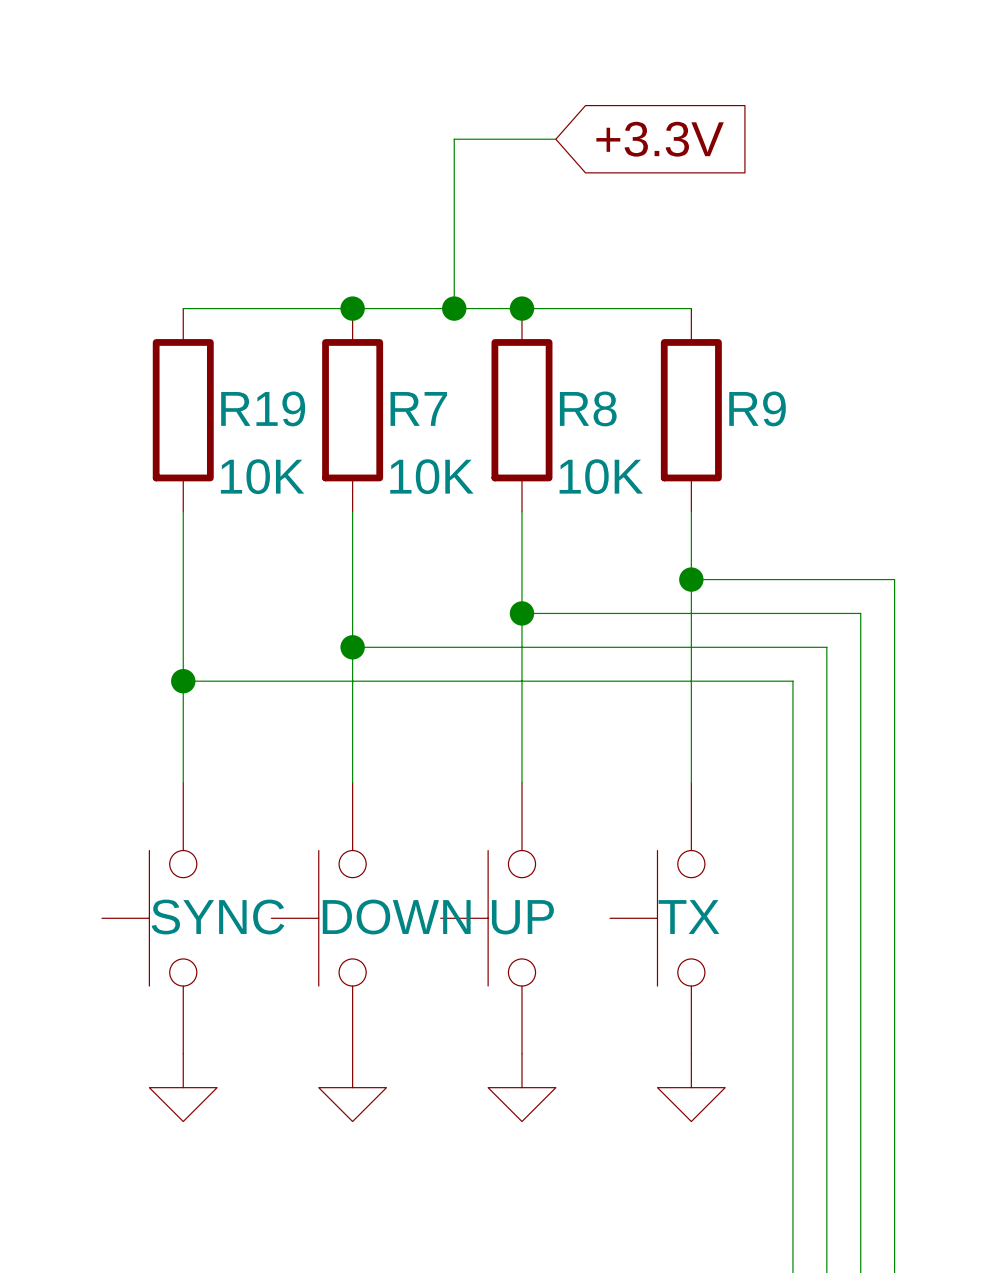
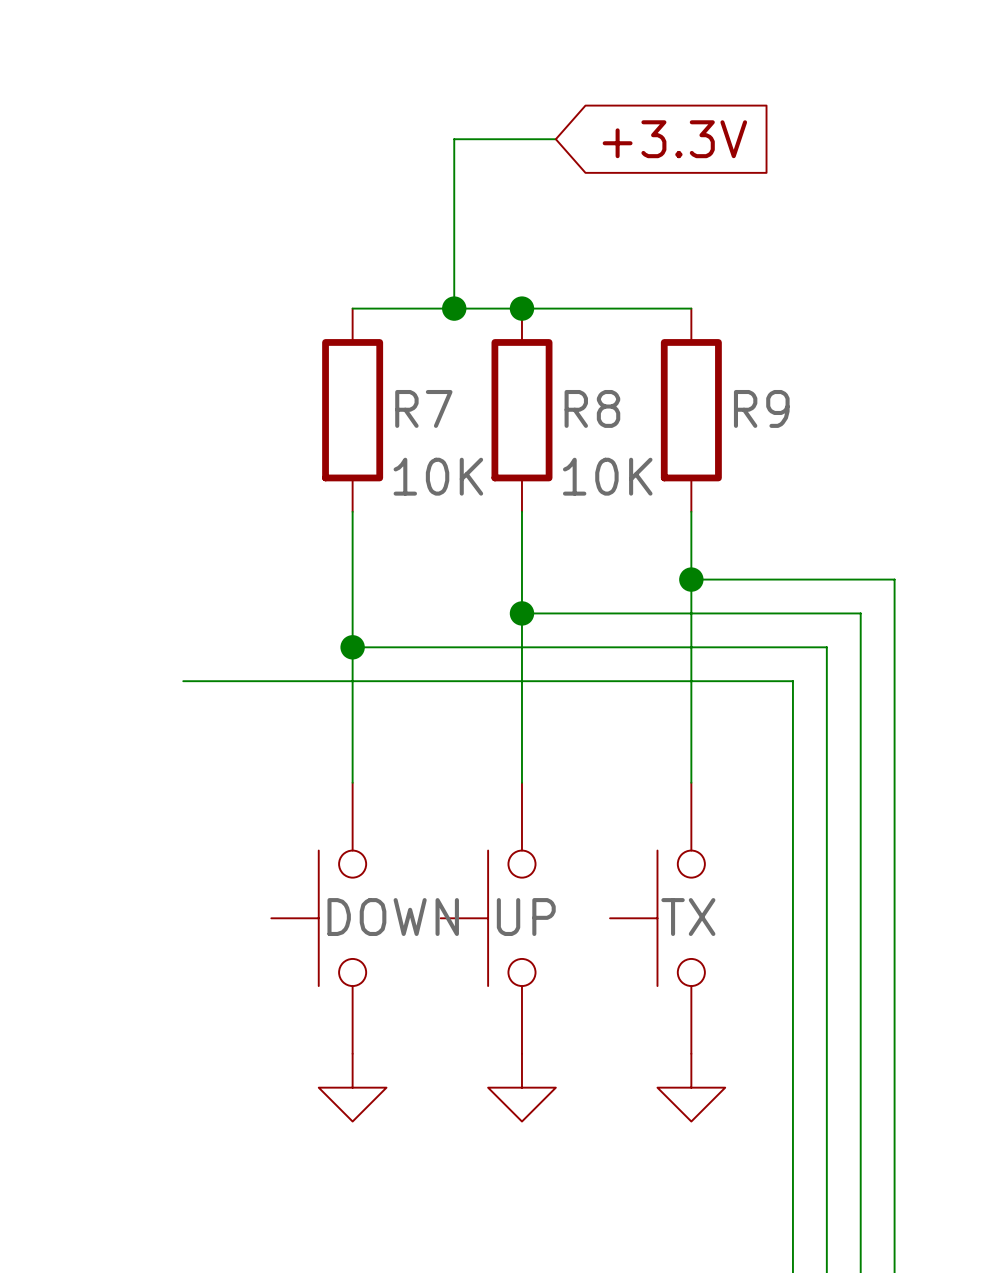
wire: (183, 308) (352, 308) -> none
junction: (352, 308) -> none
R19: 10K (183, 410) -> none
wire: (183, 511) (183, 782) -> none
junction: (183, 681) -> none
SYNC: (149, 918) -> none
power symbol: (183, 1087) -> none

